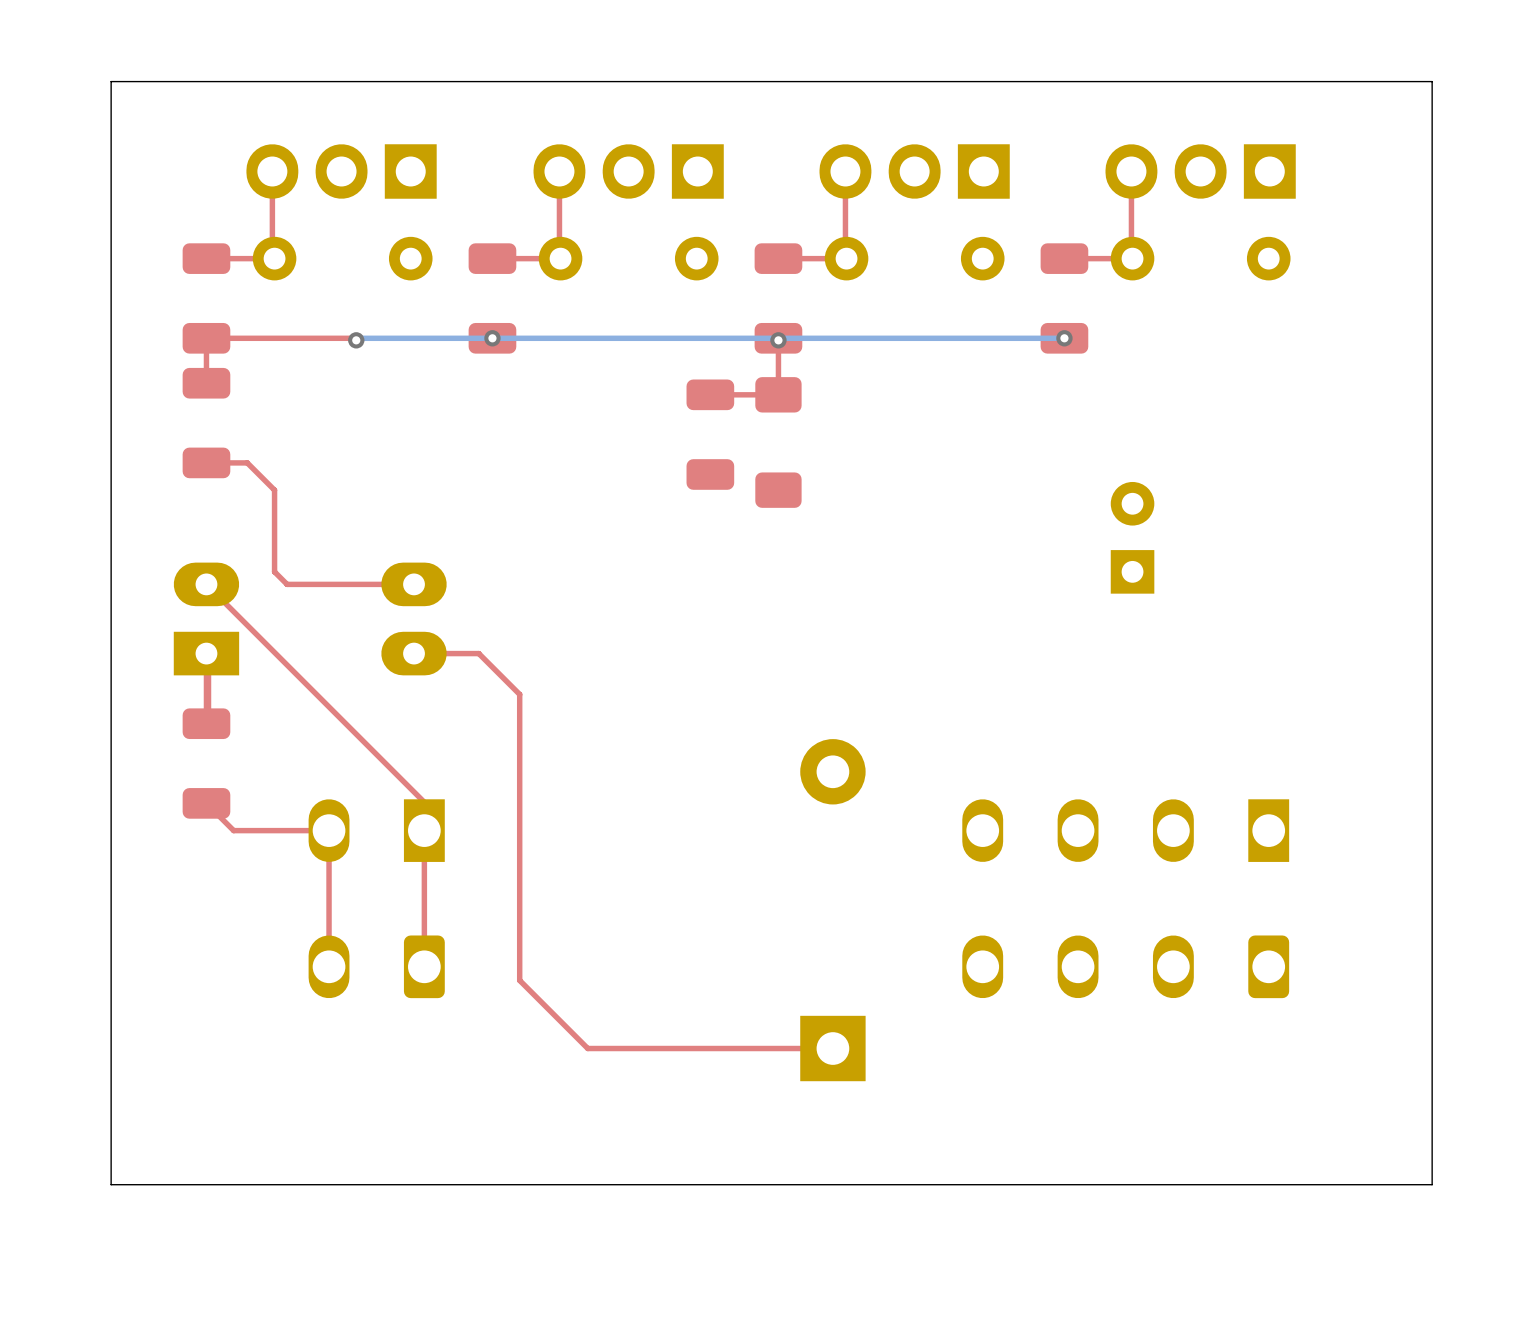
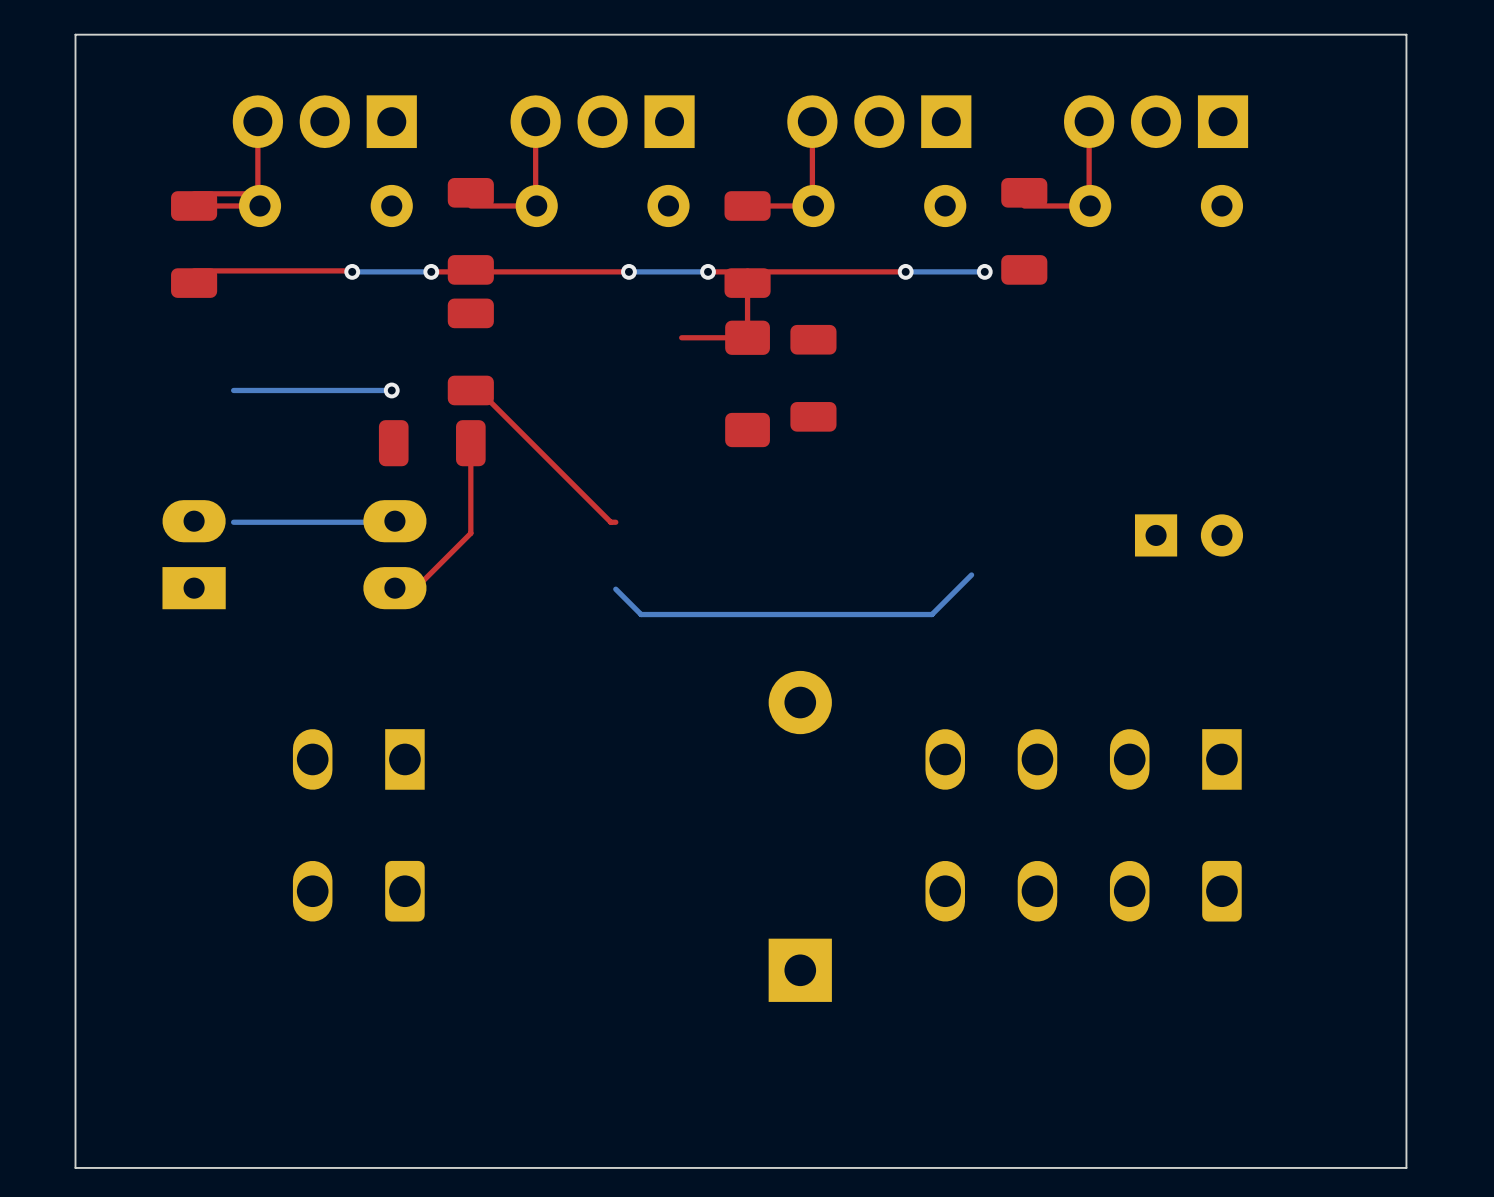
board edge: (1432, 81) (1432, 1184) (111, 1184) (111, 81) -> (1380, 34) (1406, 34) (1406, 1167) (75, 1167) (75, 34) (101, 34)
top track: none -> (194, 193) (247, 193) (257, 203)
part position: (492, 298) -> (470, 231)
part position: (1064, 298) -> (1024, 231)
top track: none -> (626, 269) (628, 271) (431, 271)
top track: none -> (194, 270) (352, 271)
top track: none -> (904, 270) (708, 271)
bottom track: none -> (431, 271) (352, 271)
via: none -> (628, 271)
bottom track: none -> (708, 271) (628, 271)
via: none -> (905, 271)
bottom track: none -> (984, 271) (905, 271)
via position: (492, 338) -> (431, 271)
bottom track: (1064, 338) (780, 338) (778, 340) (776, 338) (358, 338) (356, 340) -> none
via position: (1064, 338) -> (984, 271)
top track: (356, 340) (354, 338) (206, 338) (206, 383) -> none
via position: (356, 340) -> (352, 271)
via position: (778, 340) -> (708, 271)
part: none -> (470, 351)
part: (206, 423) -> none
part: (710, 434) -> none
part: none -> (813, 378)
top track: none -> (470, 382) (610, 522) (615, 522)
bottom track: none -> (391, 390) (233, 390)
via: none -> (391, 390)
top track: (206, 462) (247, 462) (274, 490) (274, 571) (287, 584) (414, 584) -> none
part: none -> (432, 443)
top track: none -> (470, 443) (470, 533) (414, 589)
part rotation: 0° (1132, 537) -> 90° clockwise (1189, 535)
part position: (1132, 537) -> (1189, 535)
top track: (206, 584) (424, 802) (424, 966) -> none
bottom track: none -> (414, 522) (233, 522)
bottom track: none -> (971, 574) (932, 614) (641, 614) (615, 589)
top track: (414, 653) (478, 653) (519, 694) (519, 980) (587, 1048) (832, 1048) -> none
top track: (206, 723) (206, 653) (208, 655) (208, 735) -> none
part: (206, 763) -> none
top track: (206, 803) (233, 830) (329, 830) (329, 966) -> none

